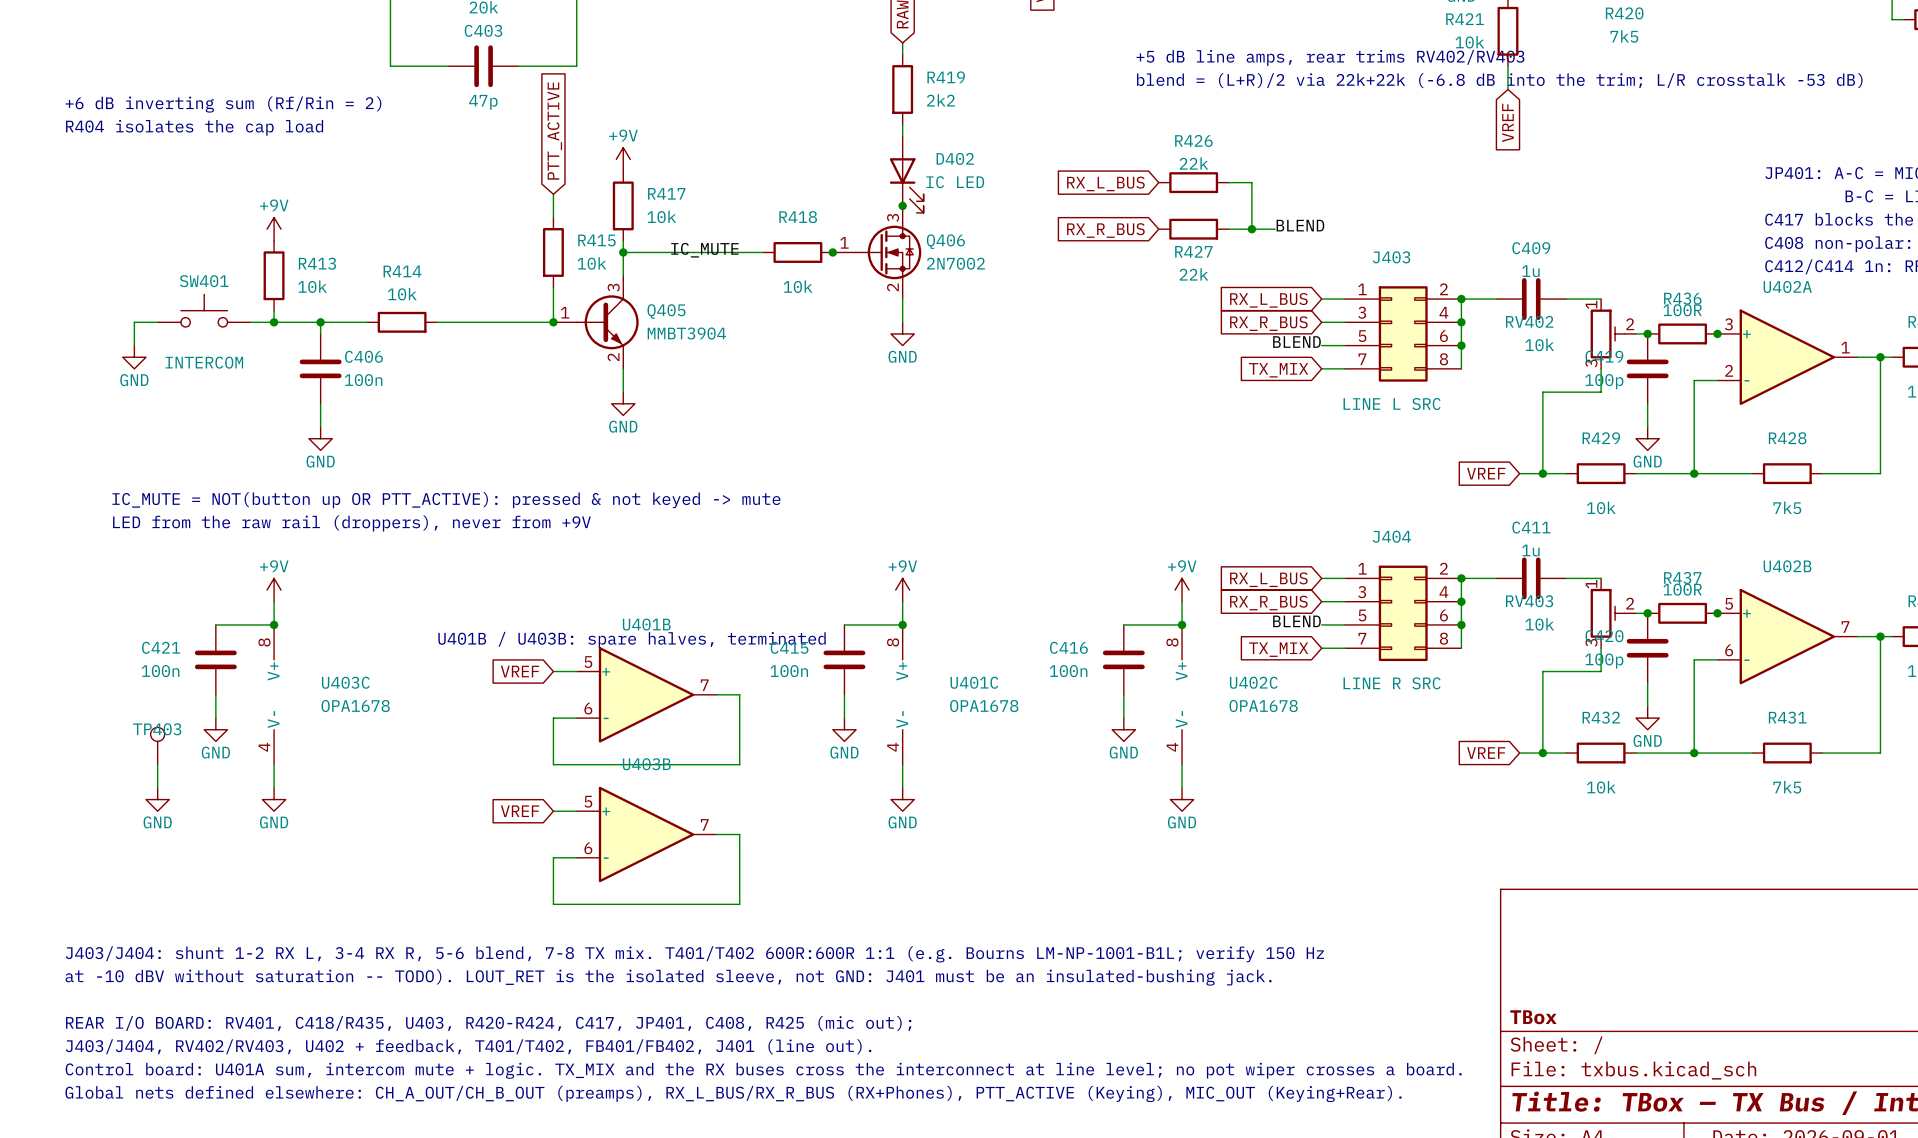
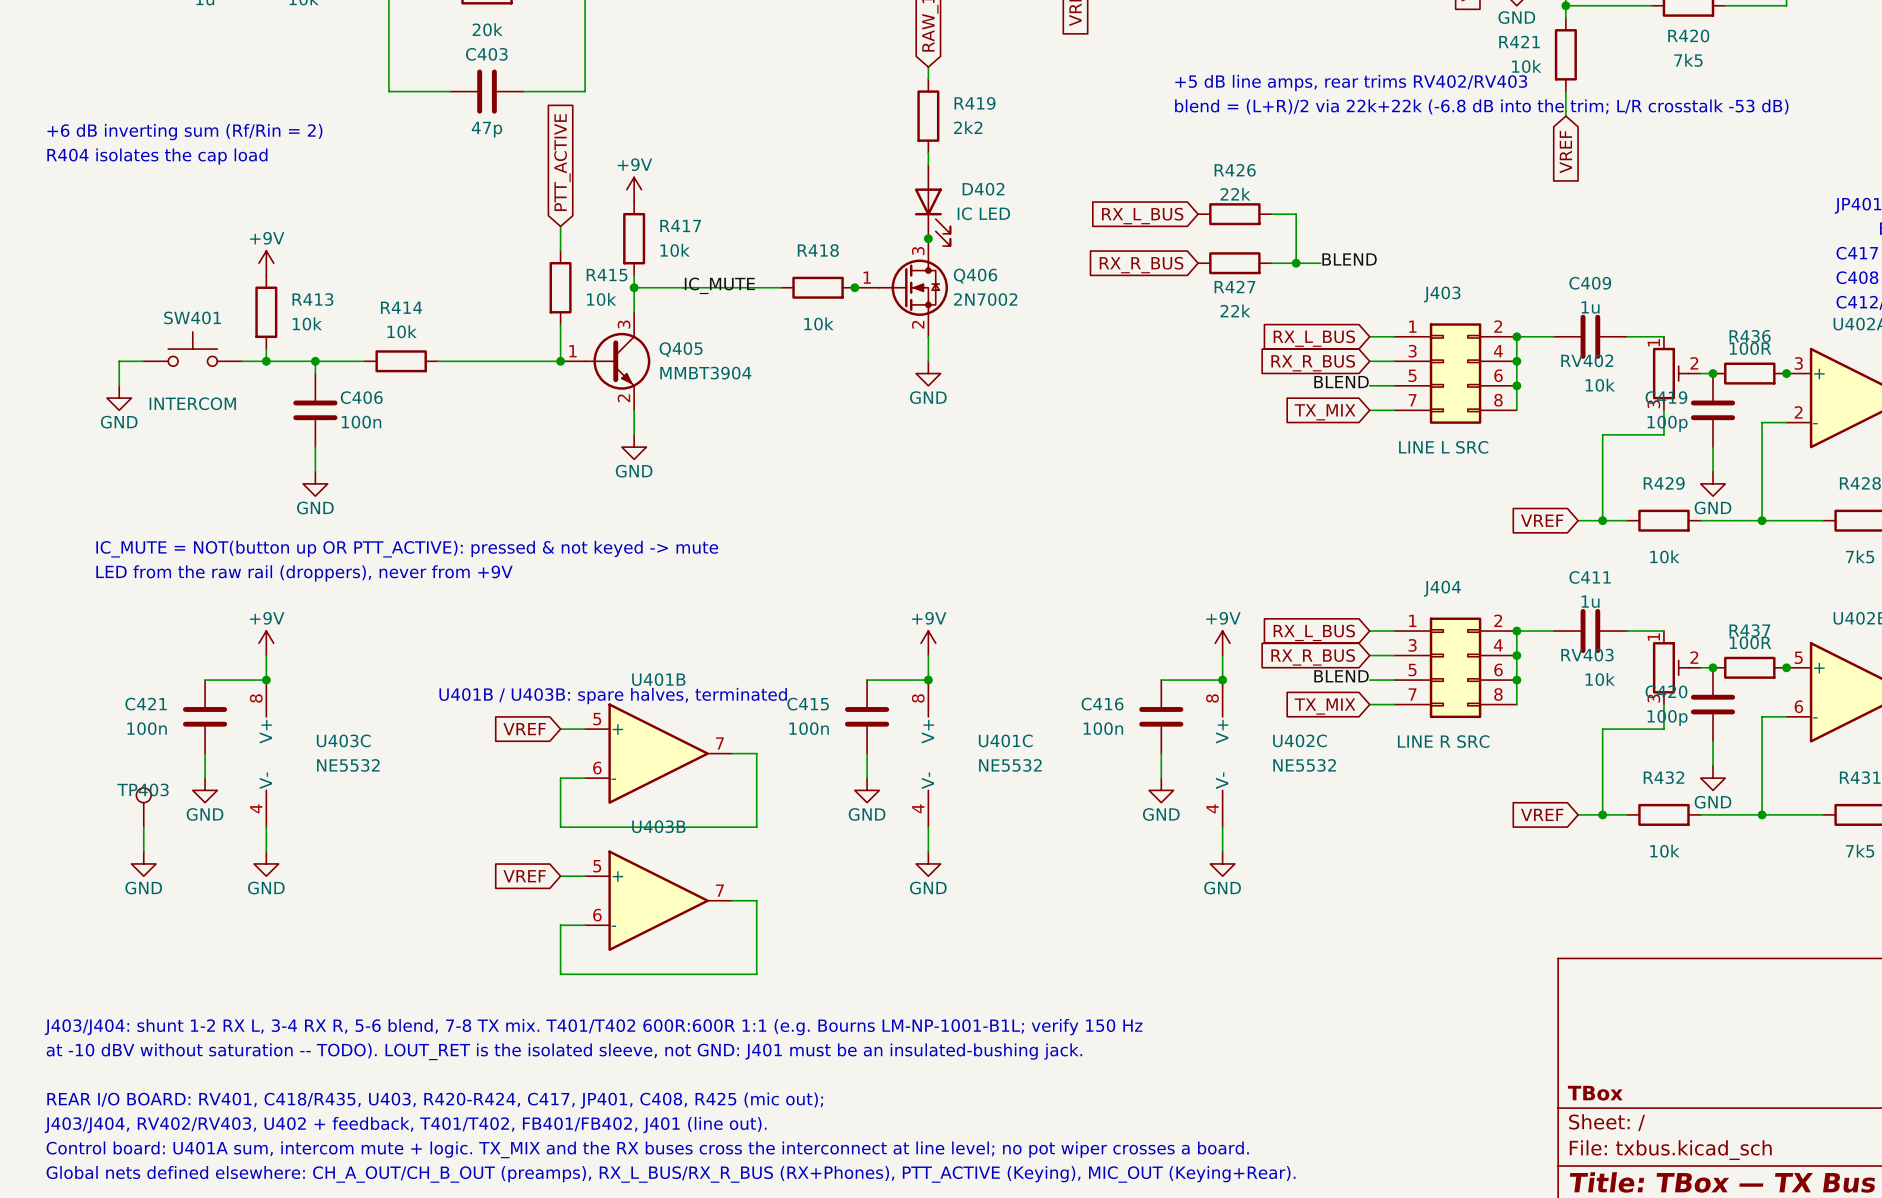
U403C value: OPA1678 (355, 706) -> NE5532 (348, 765)
U401C value: OPA1678 (984, 706) -> NE5532 (1010, 765)
U402C value: OPA1678 (1263, 706) -> NE5532 (1304, 765)

